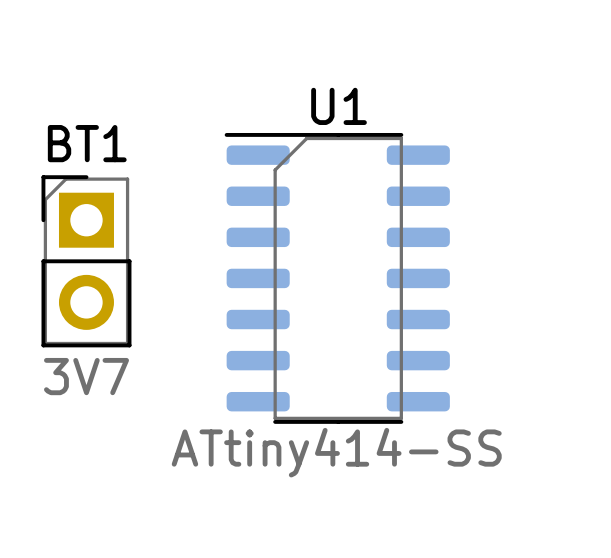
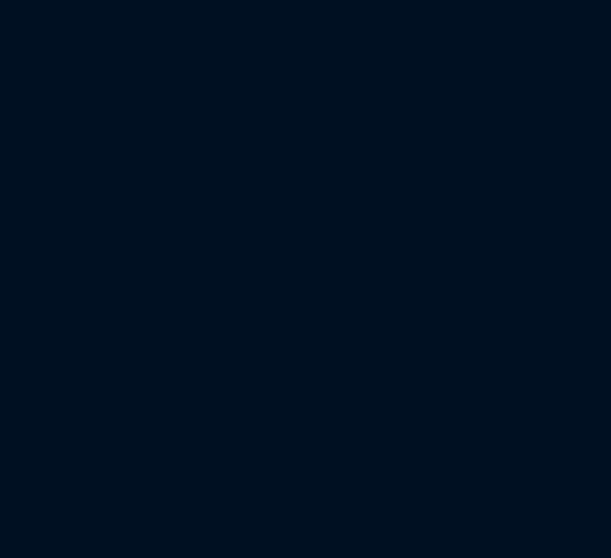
BT1: 3V7 (86, 261) -> none
U1: ATtiny414-SS (337, 278) -> none

